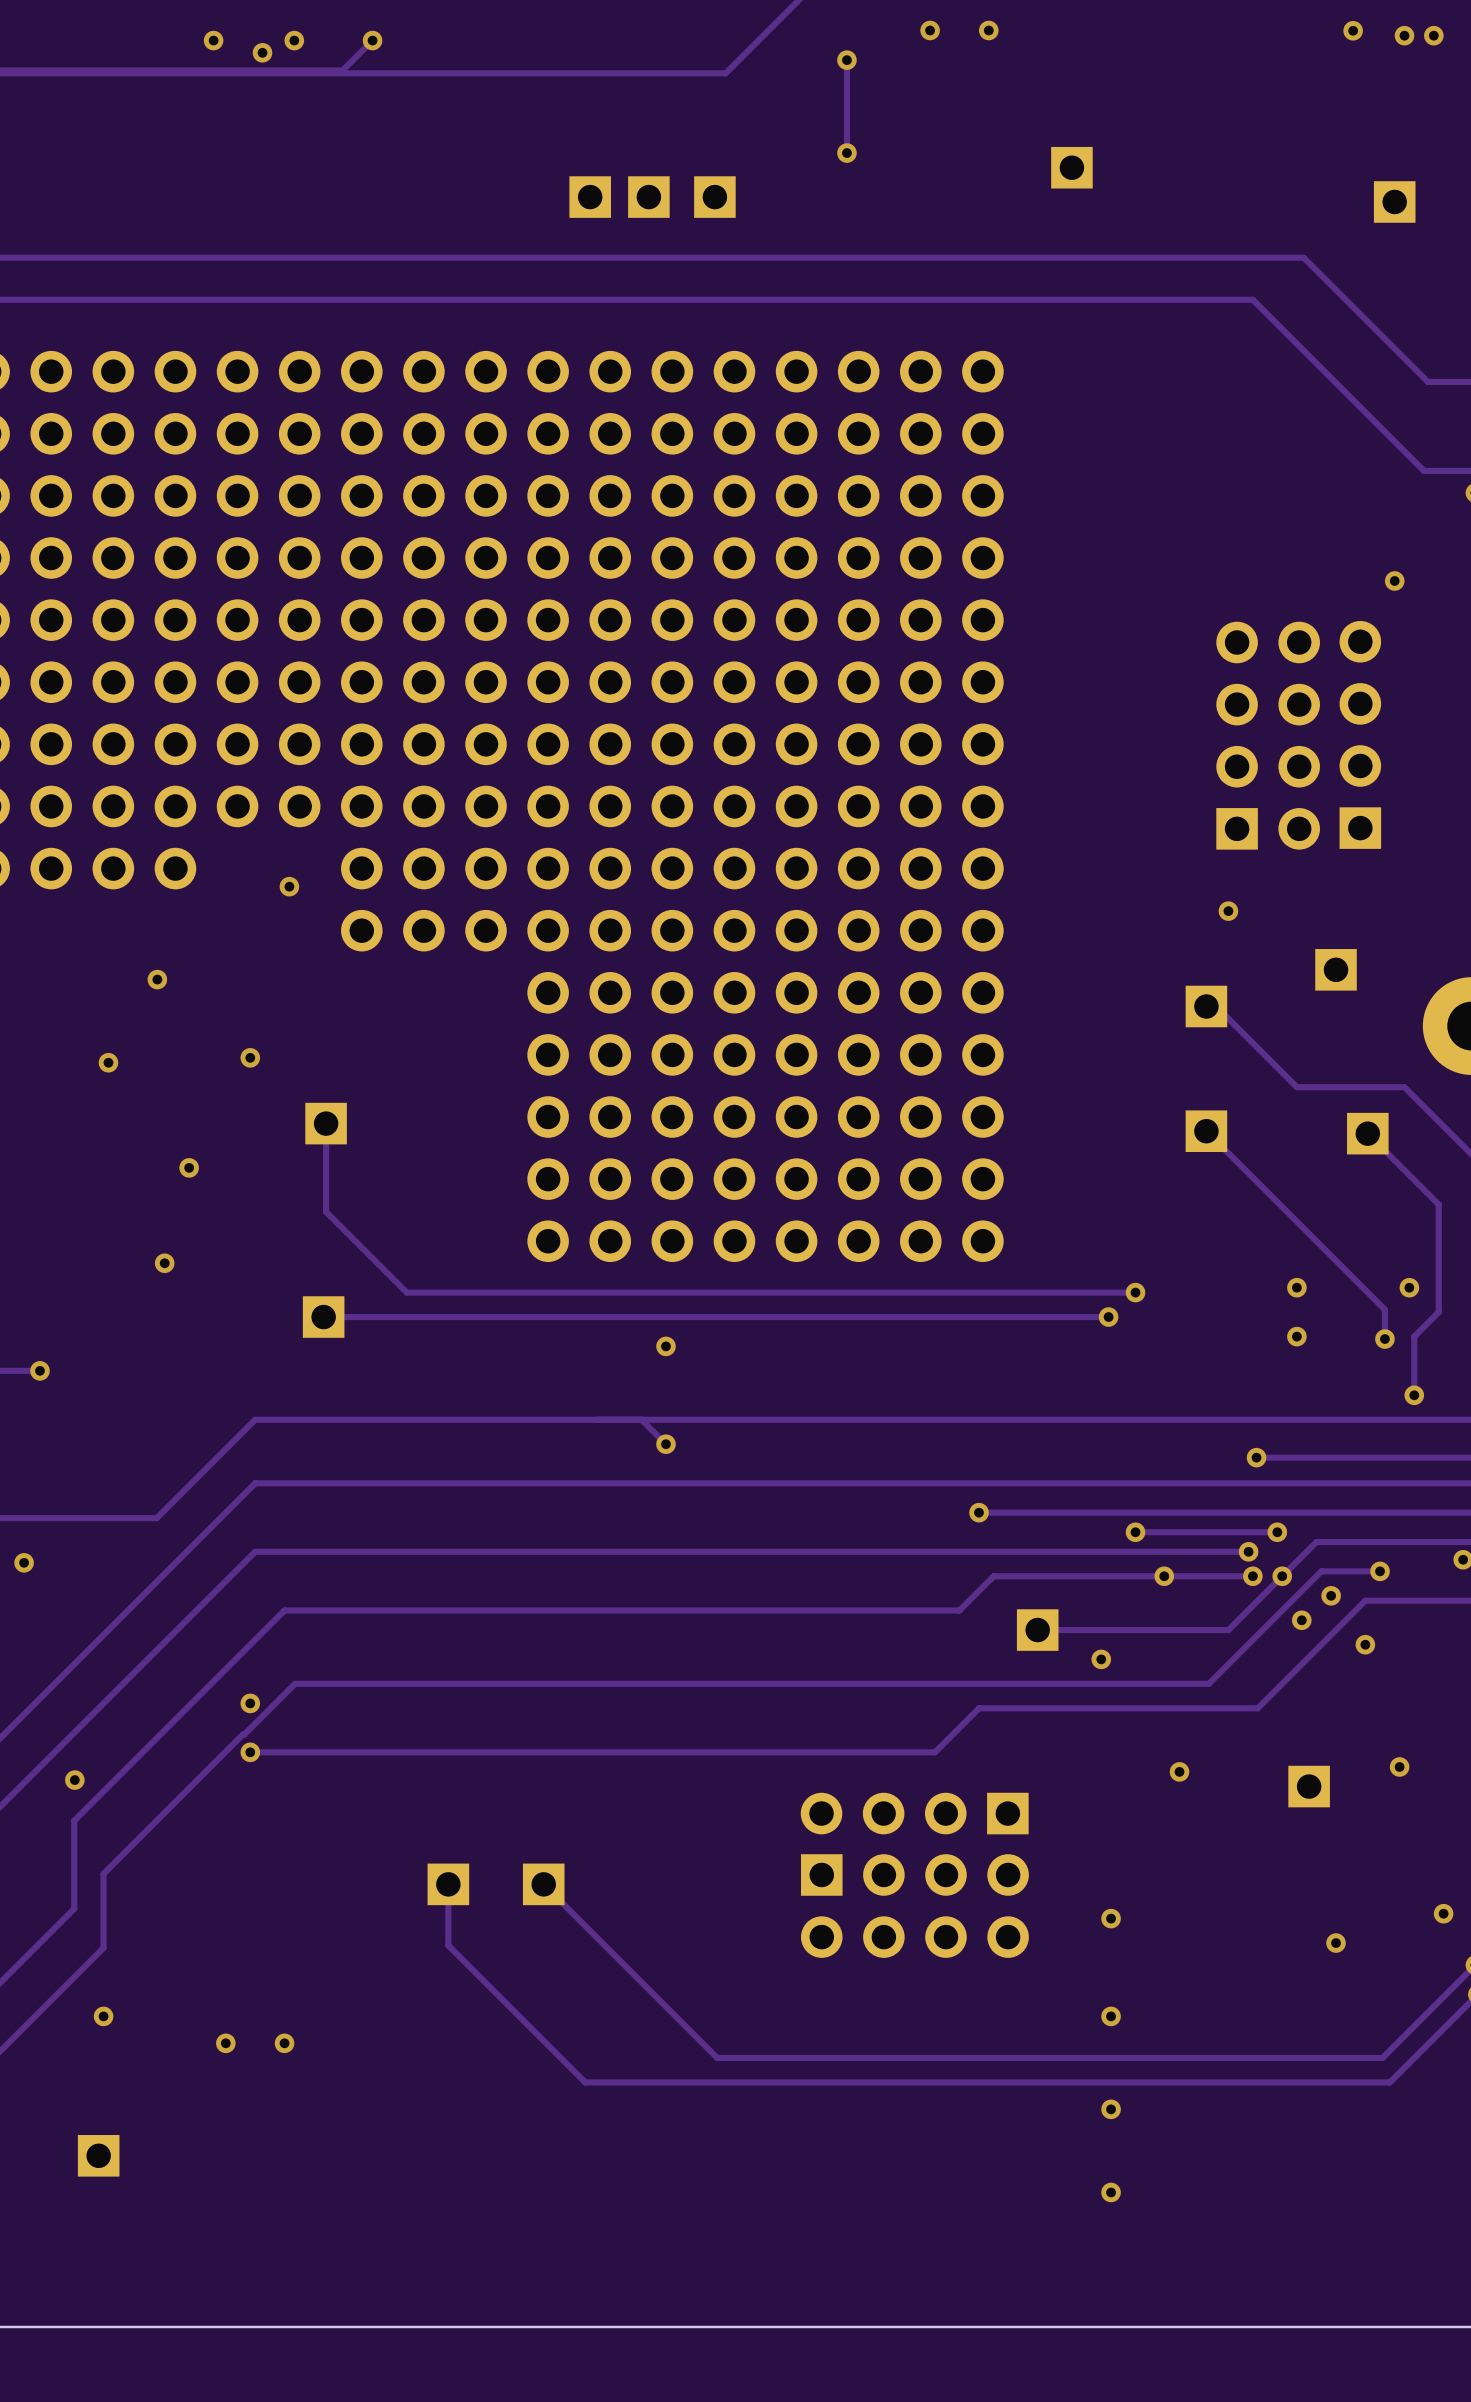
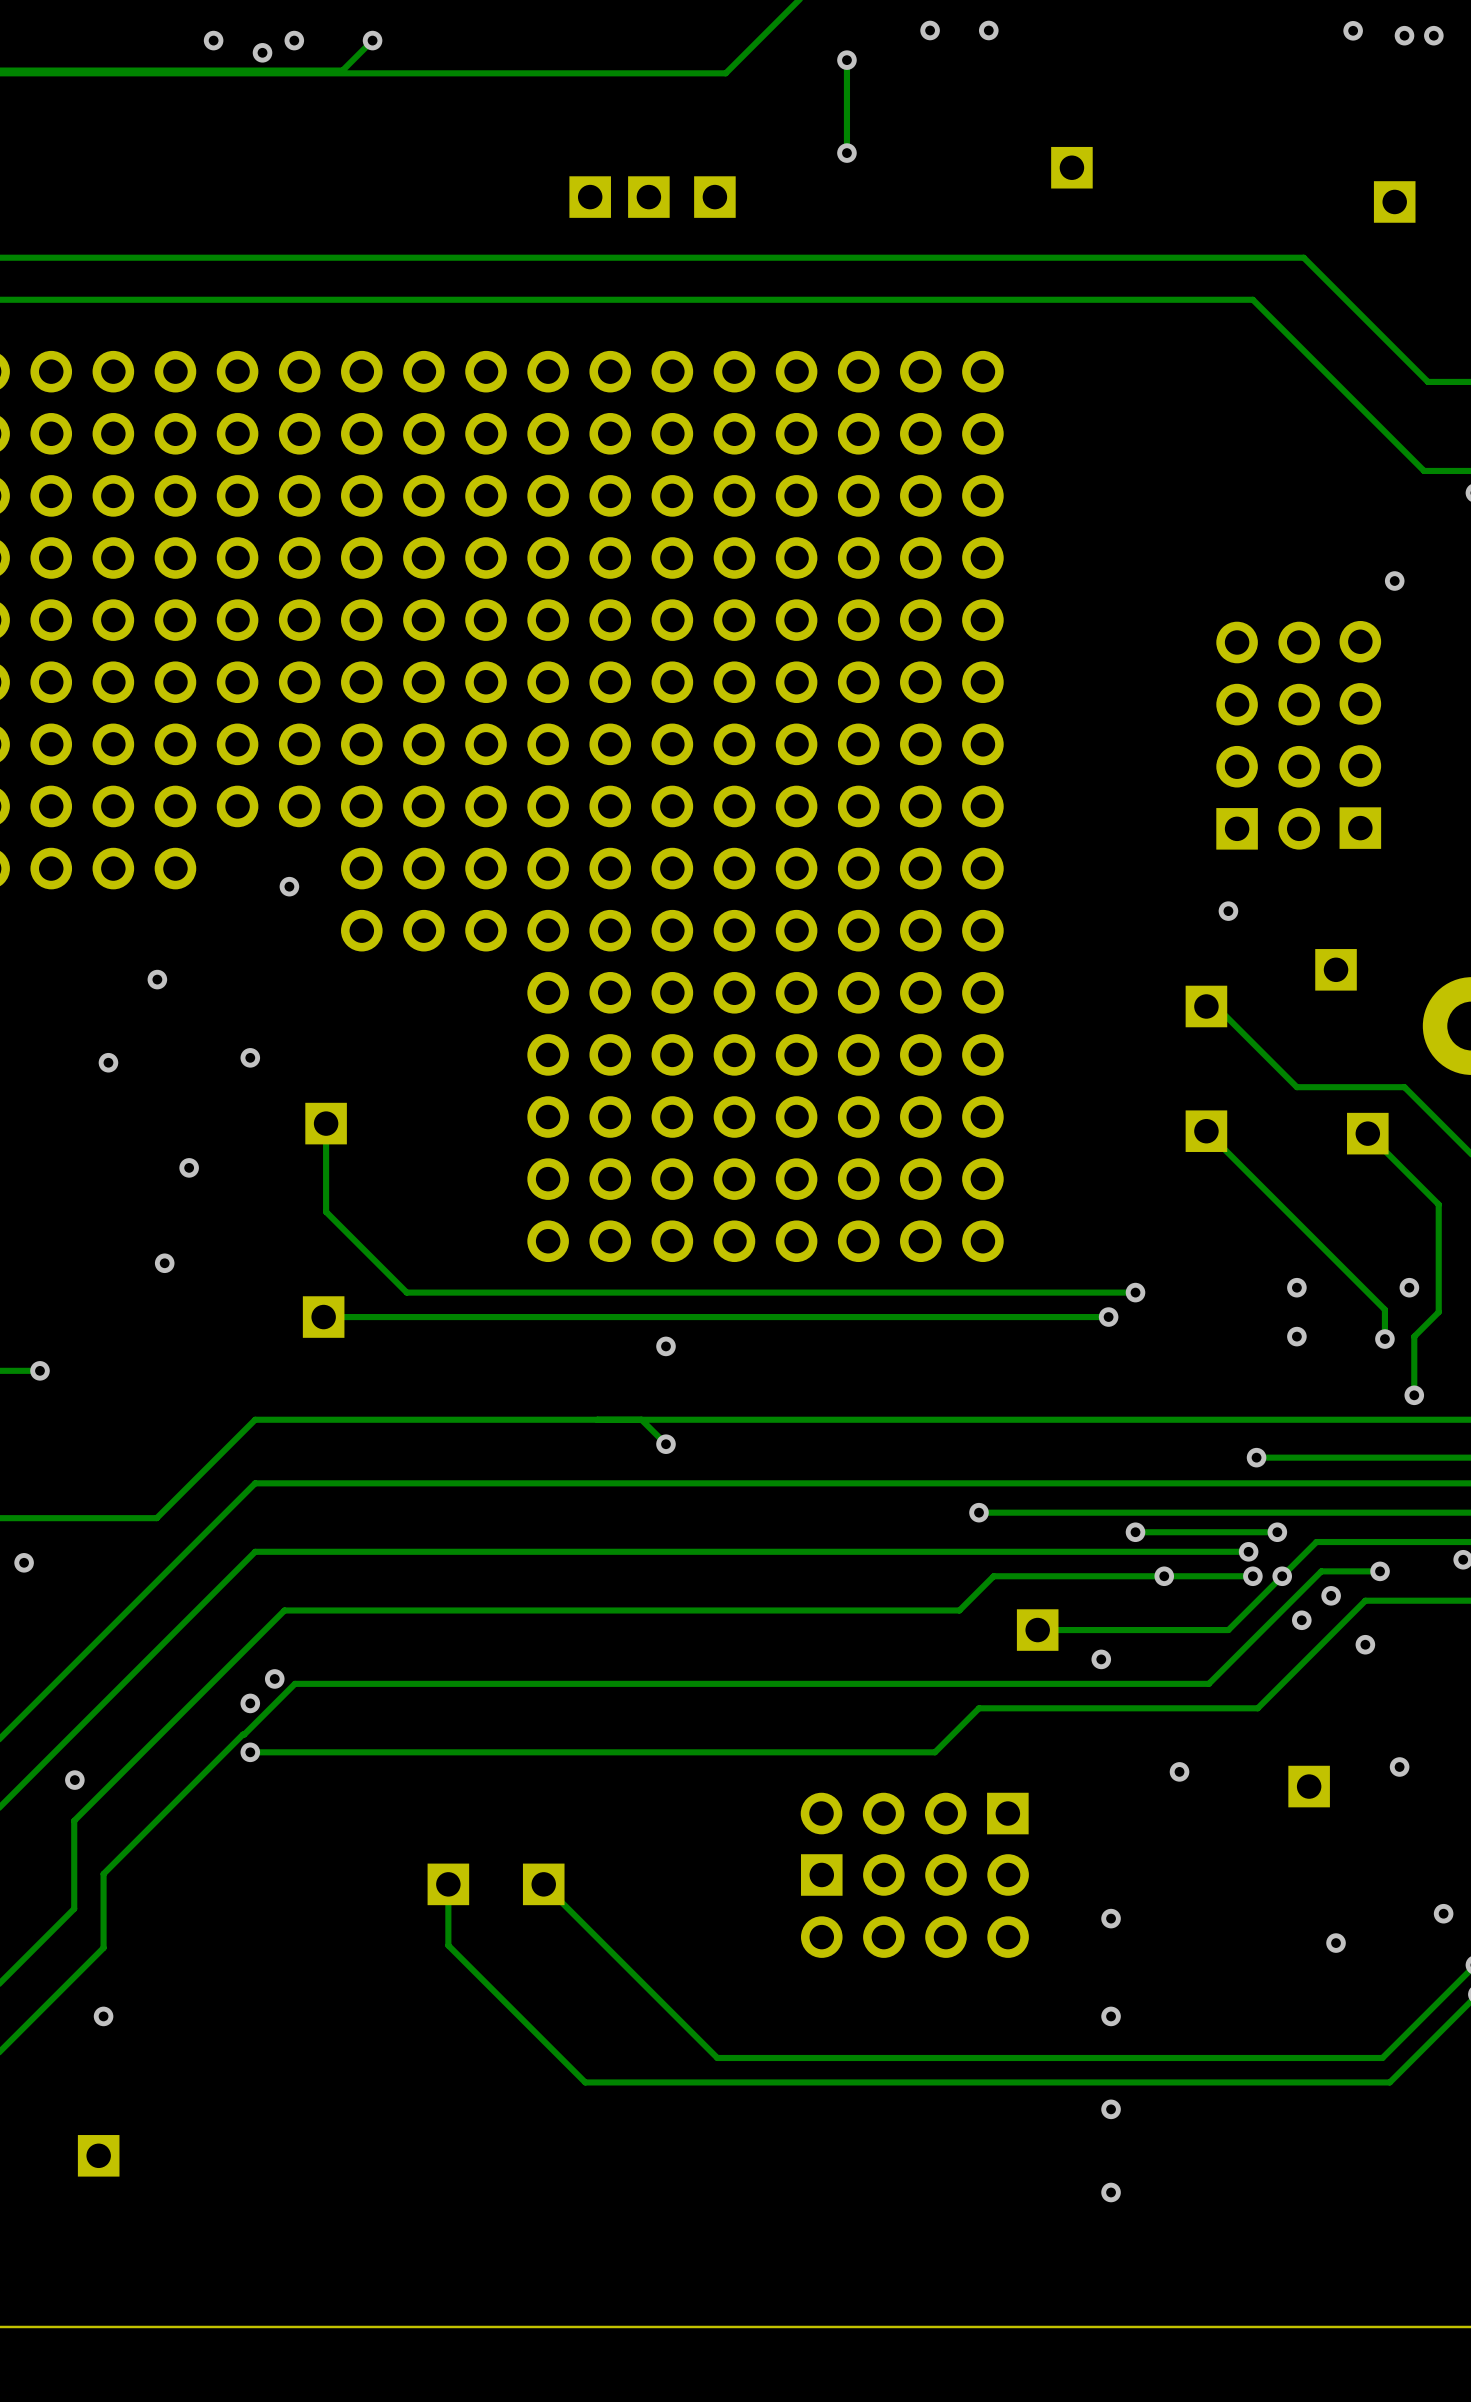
via: none -> (274, 1678)
via: (225, 2043) -> none
via: (284, 2043) -> none

